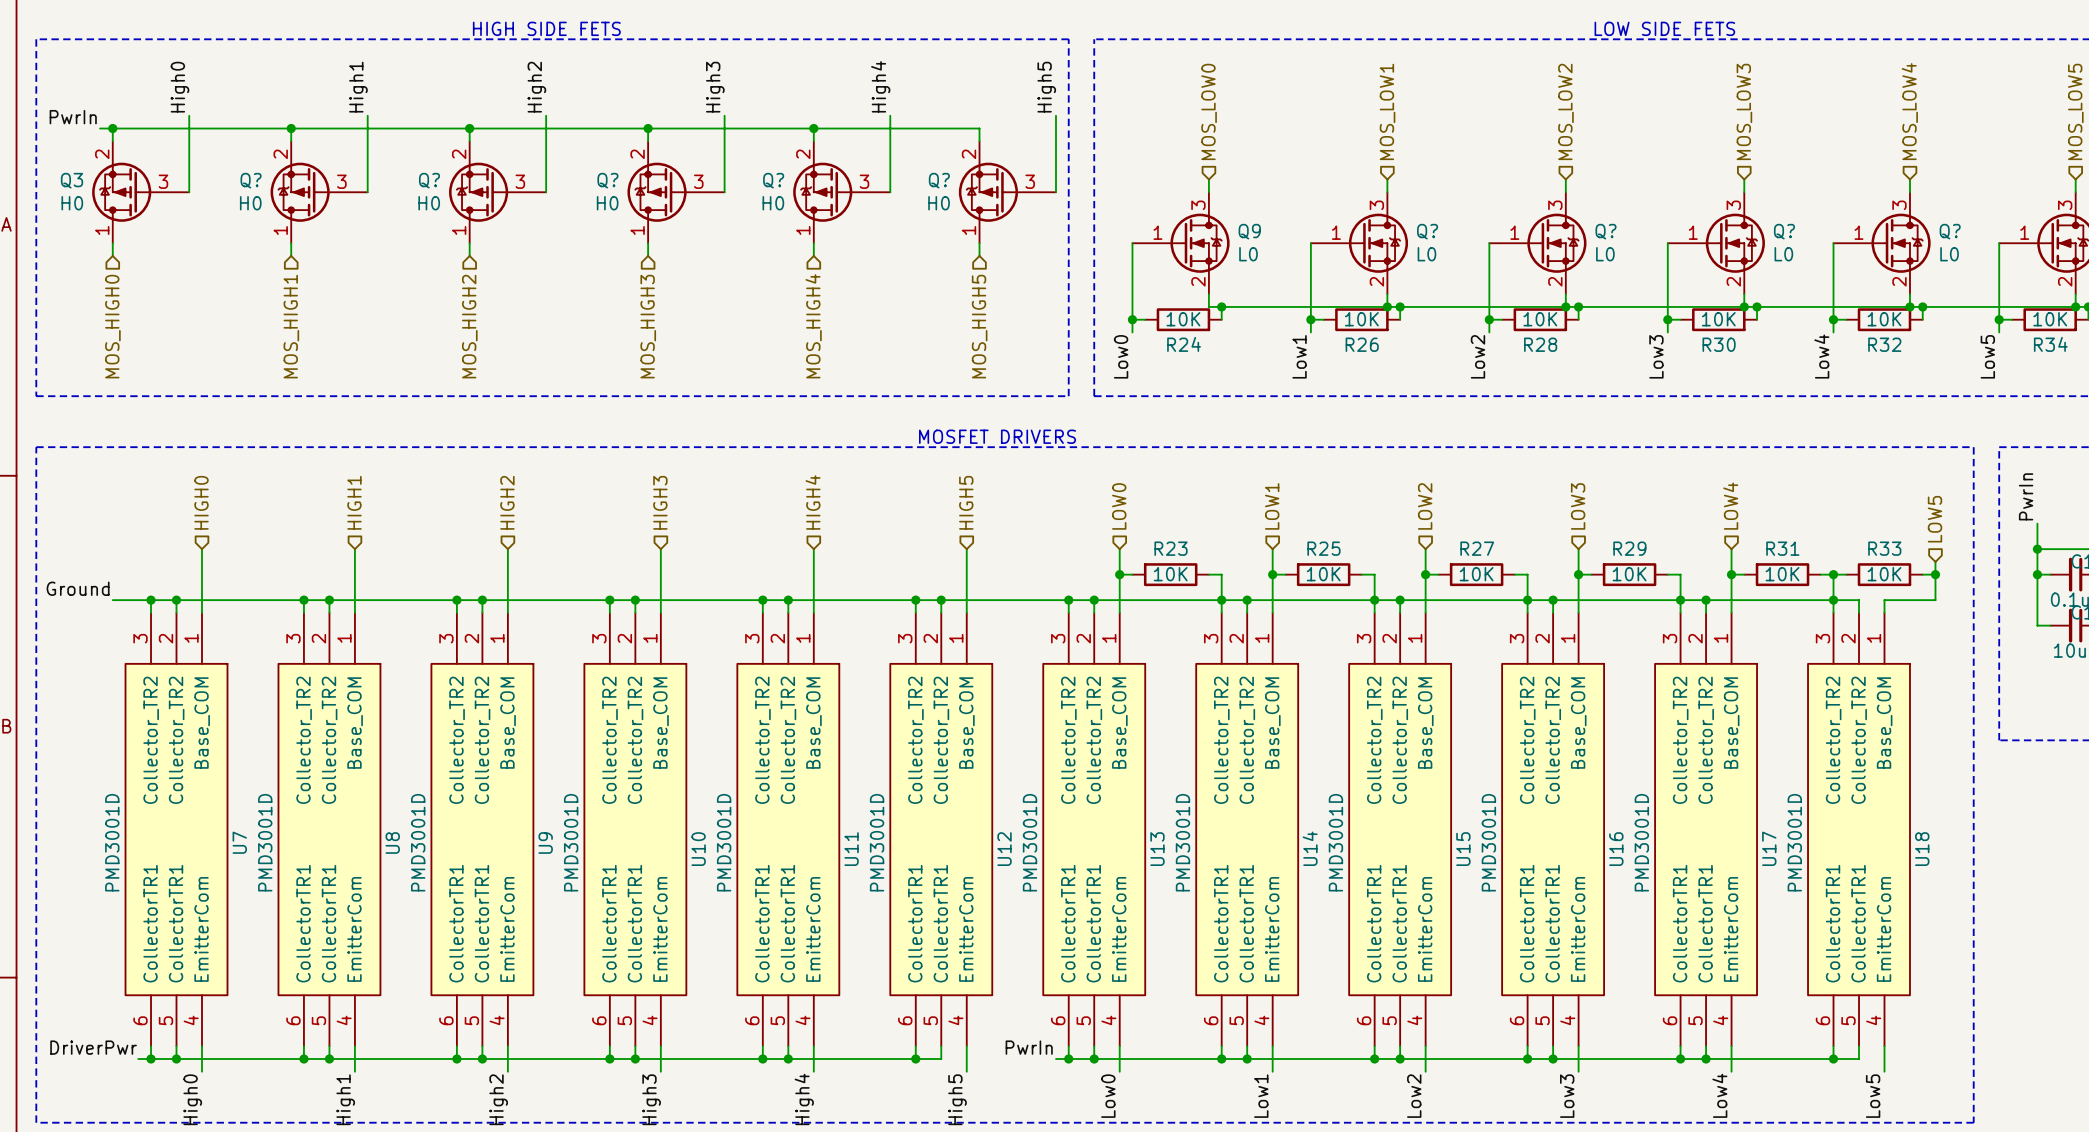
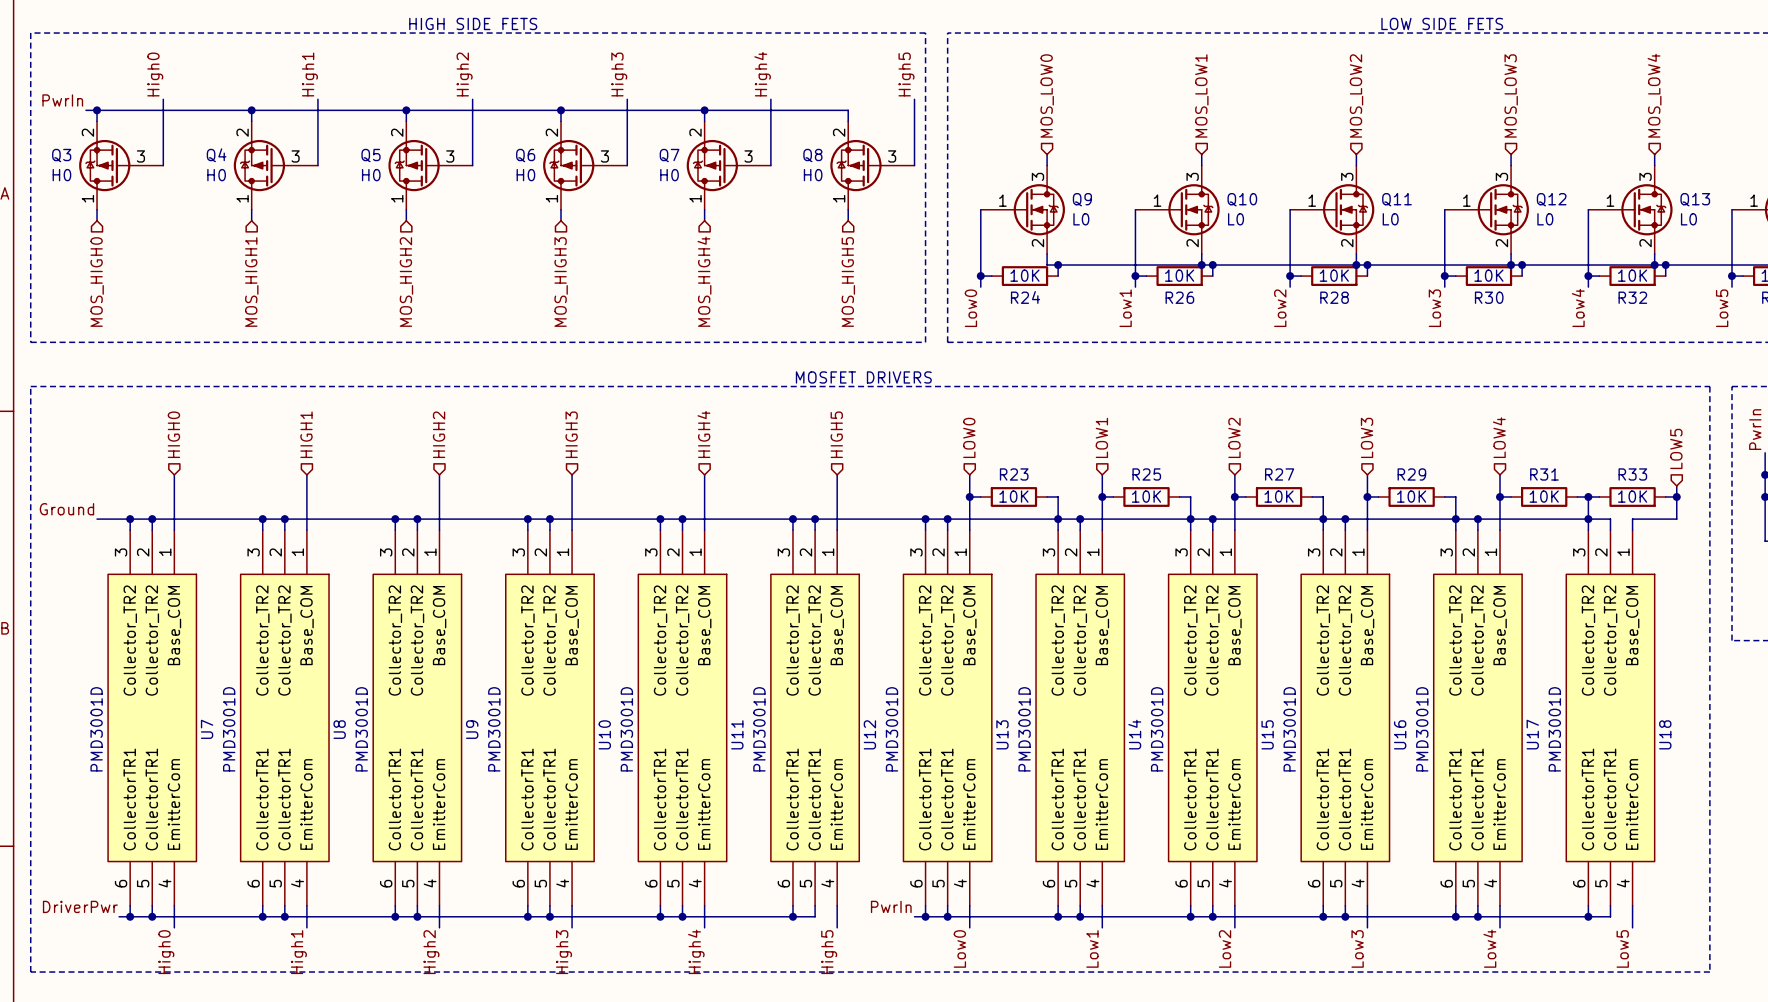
Q? name: Q? (251, 180) -> Q4 (216, 155)
Q? name: Q? (429, 180) -> Q5 (371, 155)
Q? name: Q? (607, 180) -> Q6 (525, 155)
Q? name: Q? (773, 180) -> Q7 (669, 155)
Q? name: Q? (939, 180) -> Q8 (812, 155)
Q? name: Q? (1427, 231) -> Q10 (1242, 199)
Q? name: Q? (1606, 231) -> Q11 (1396, 199)
Q? name: Q? (1784, 231) -> Q12 (1551, 199)
Q? name: Q? (1950, 231) -> Q13 (1695, 199)

